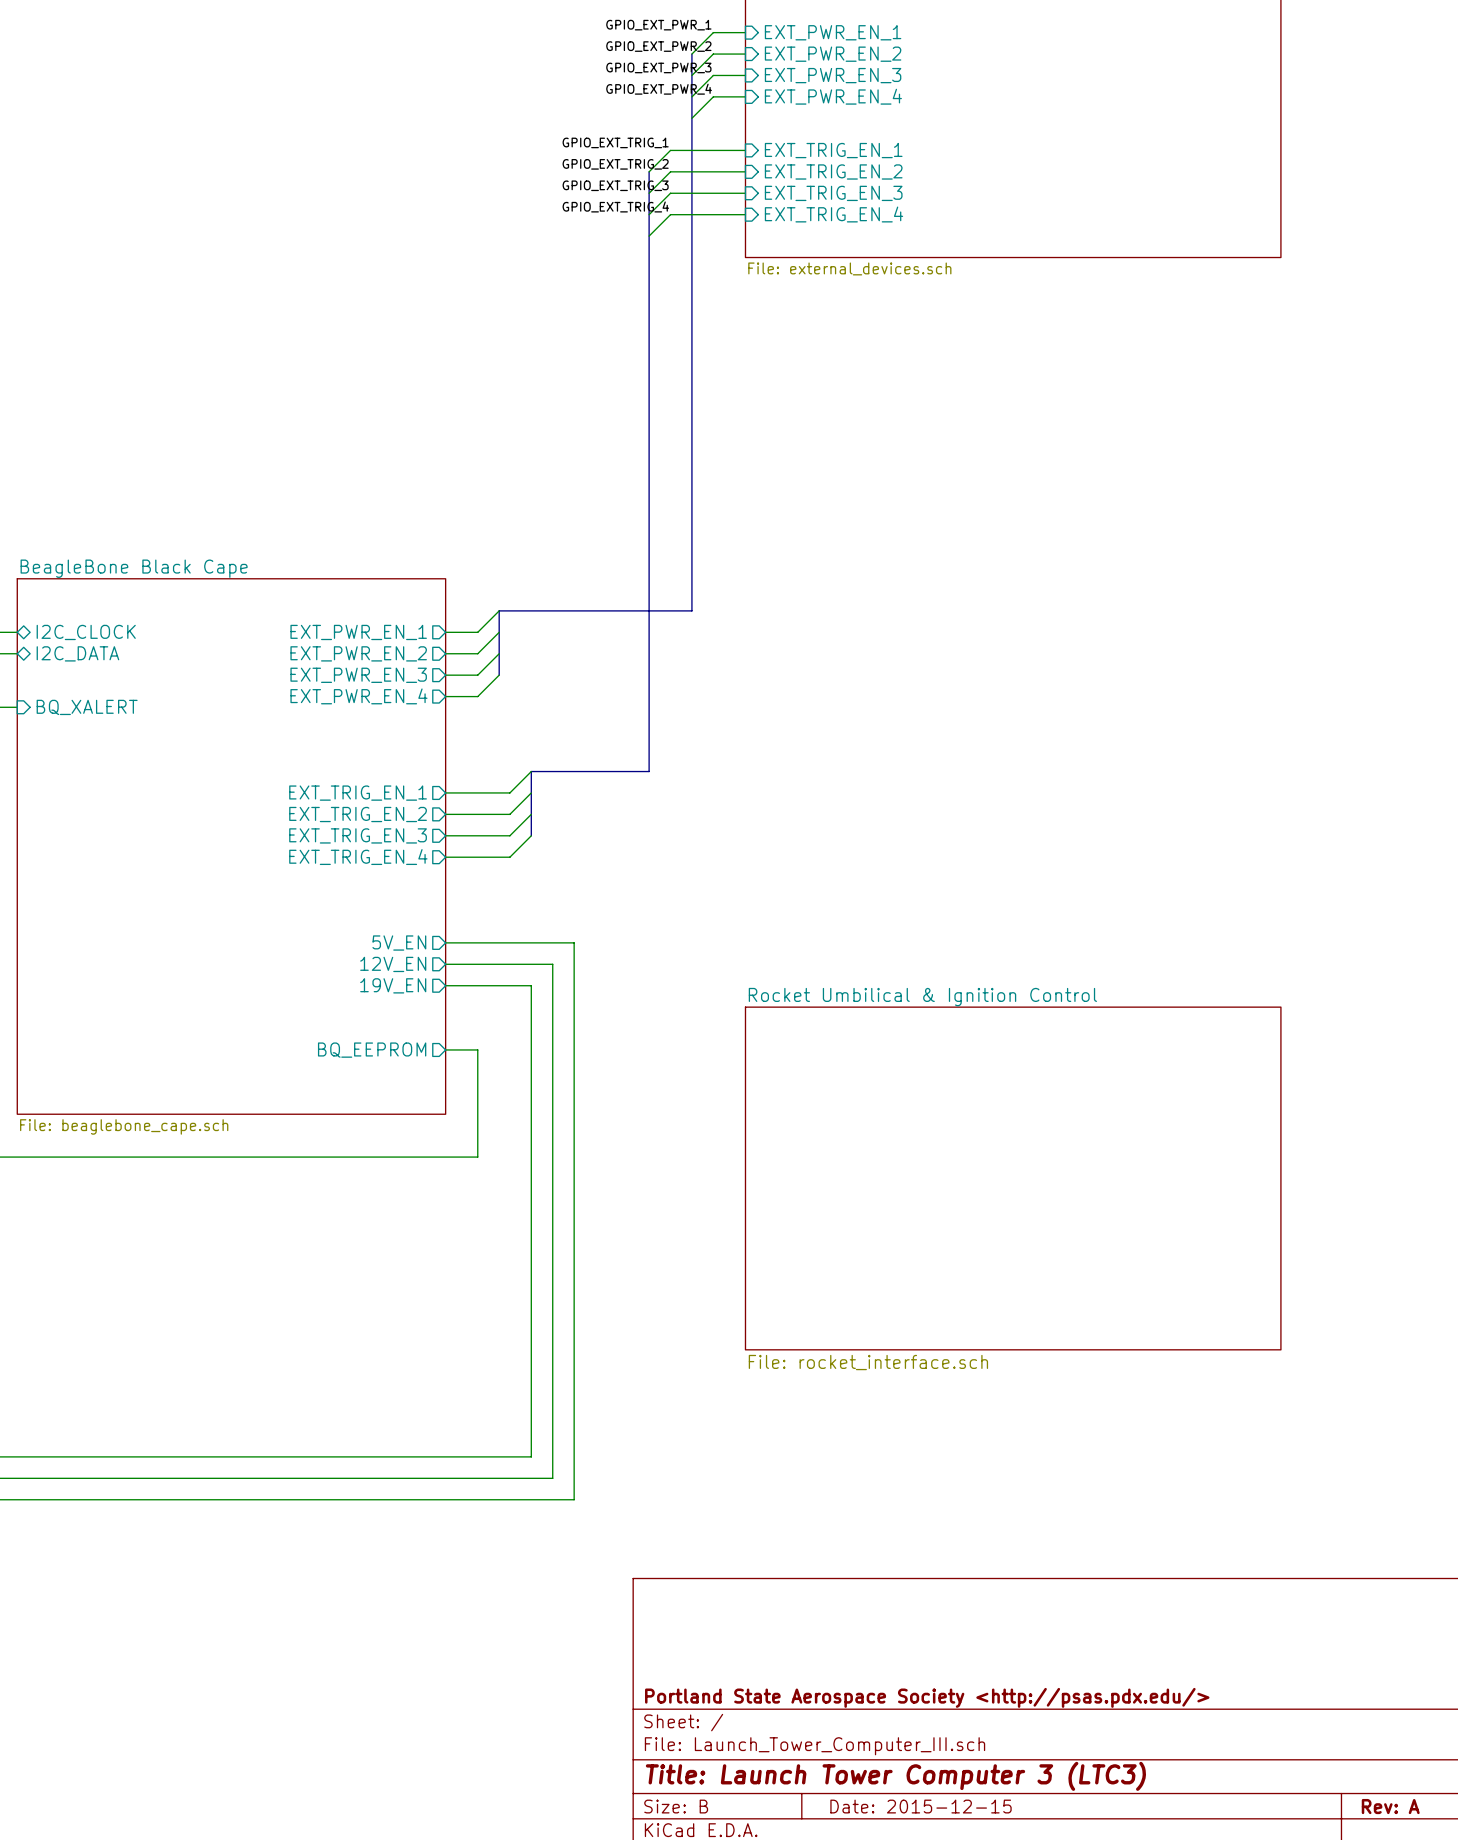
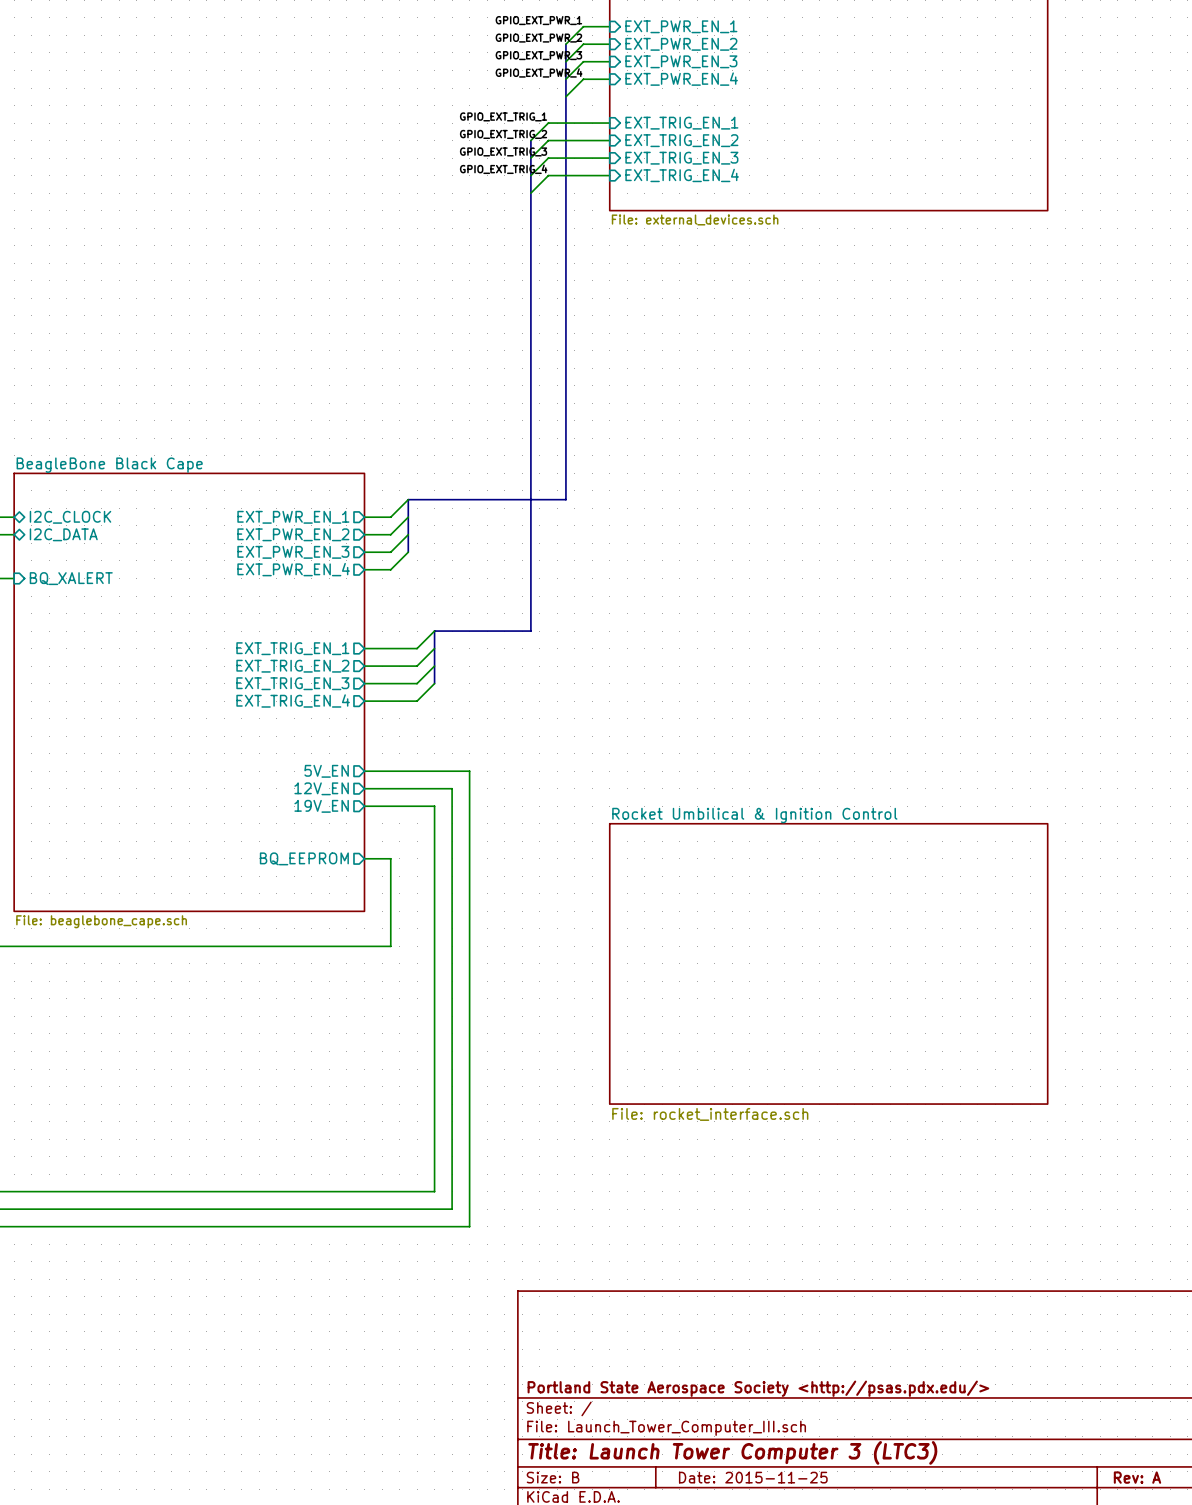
title block: Date: 2015-12-15 (921, 1806) -> Date: 2015-11-25 (753, 1477)

